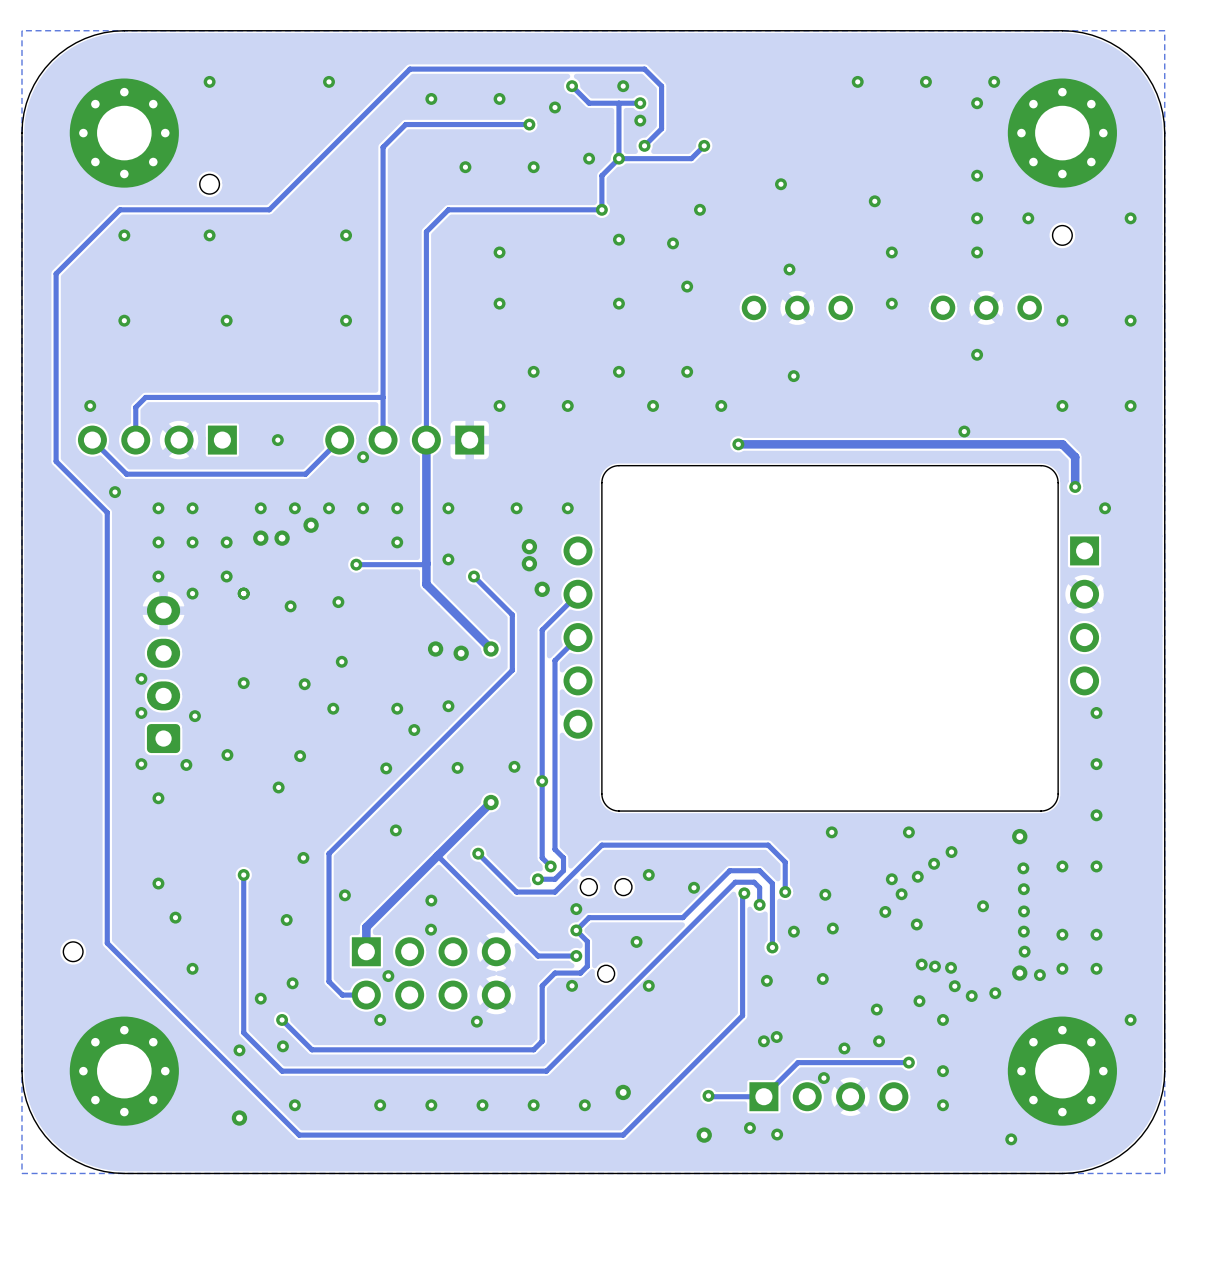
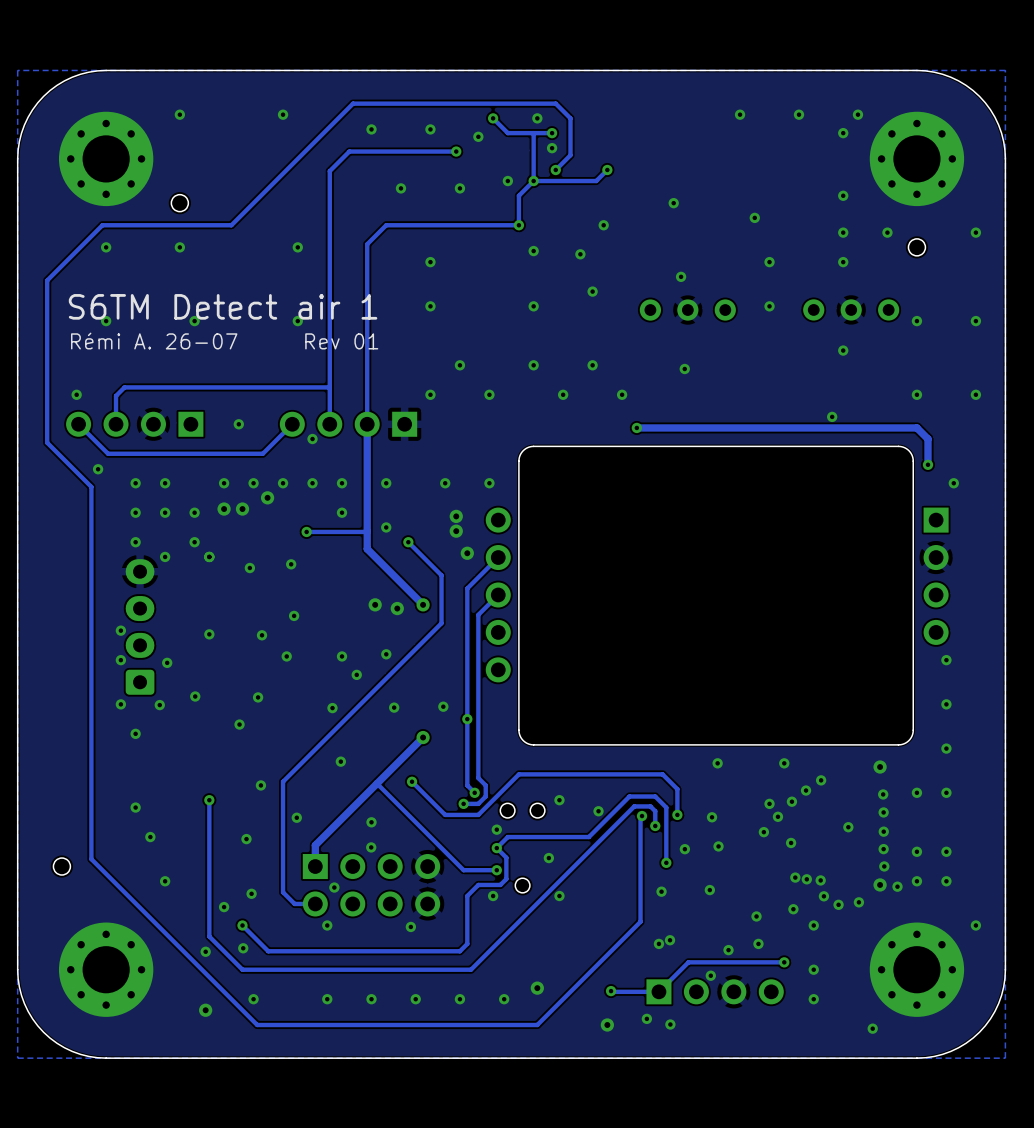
text: none -> S6TM Detect air 1 (223, 306)
text: none -> Rémi A. 26-07 (154, 341)
text: none -> Rev 01 (341, 341)

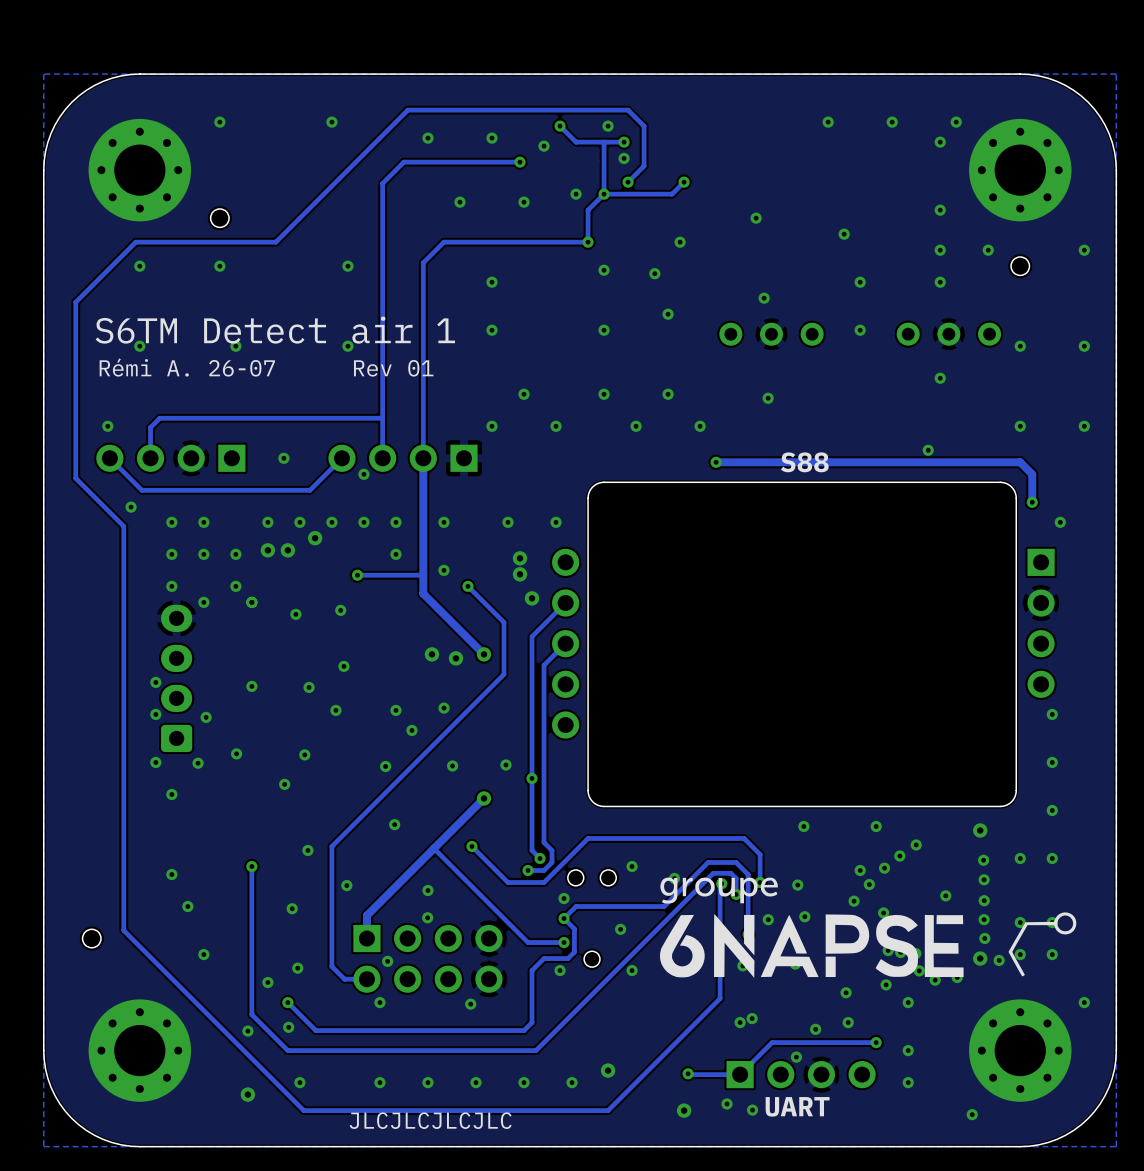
text: none -> S88 (804, 462)
drawing: none -> [659, 877, 1077, 978]
text: none -> UART (797, 1106)
text: none -> JLCJLCJLCJLC (430, 1120)

